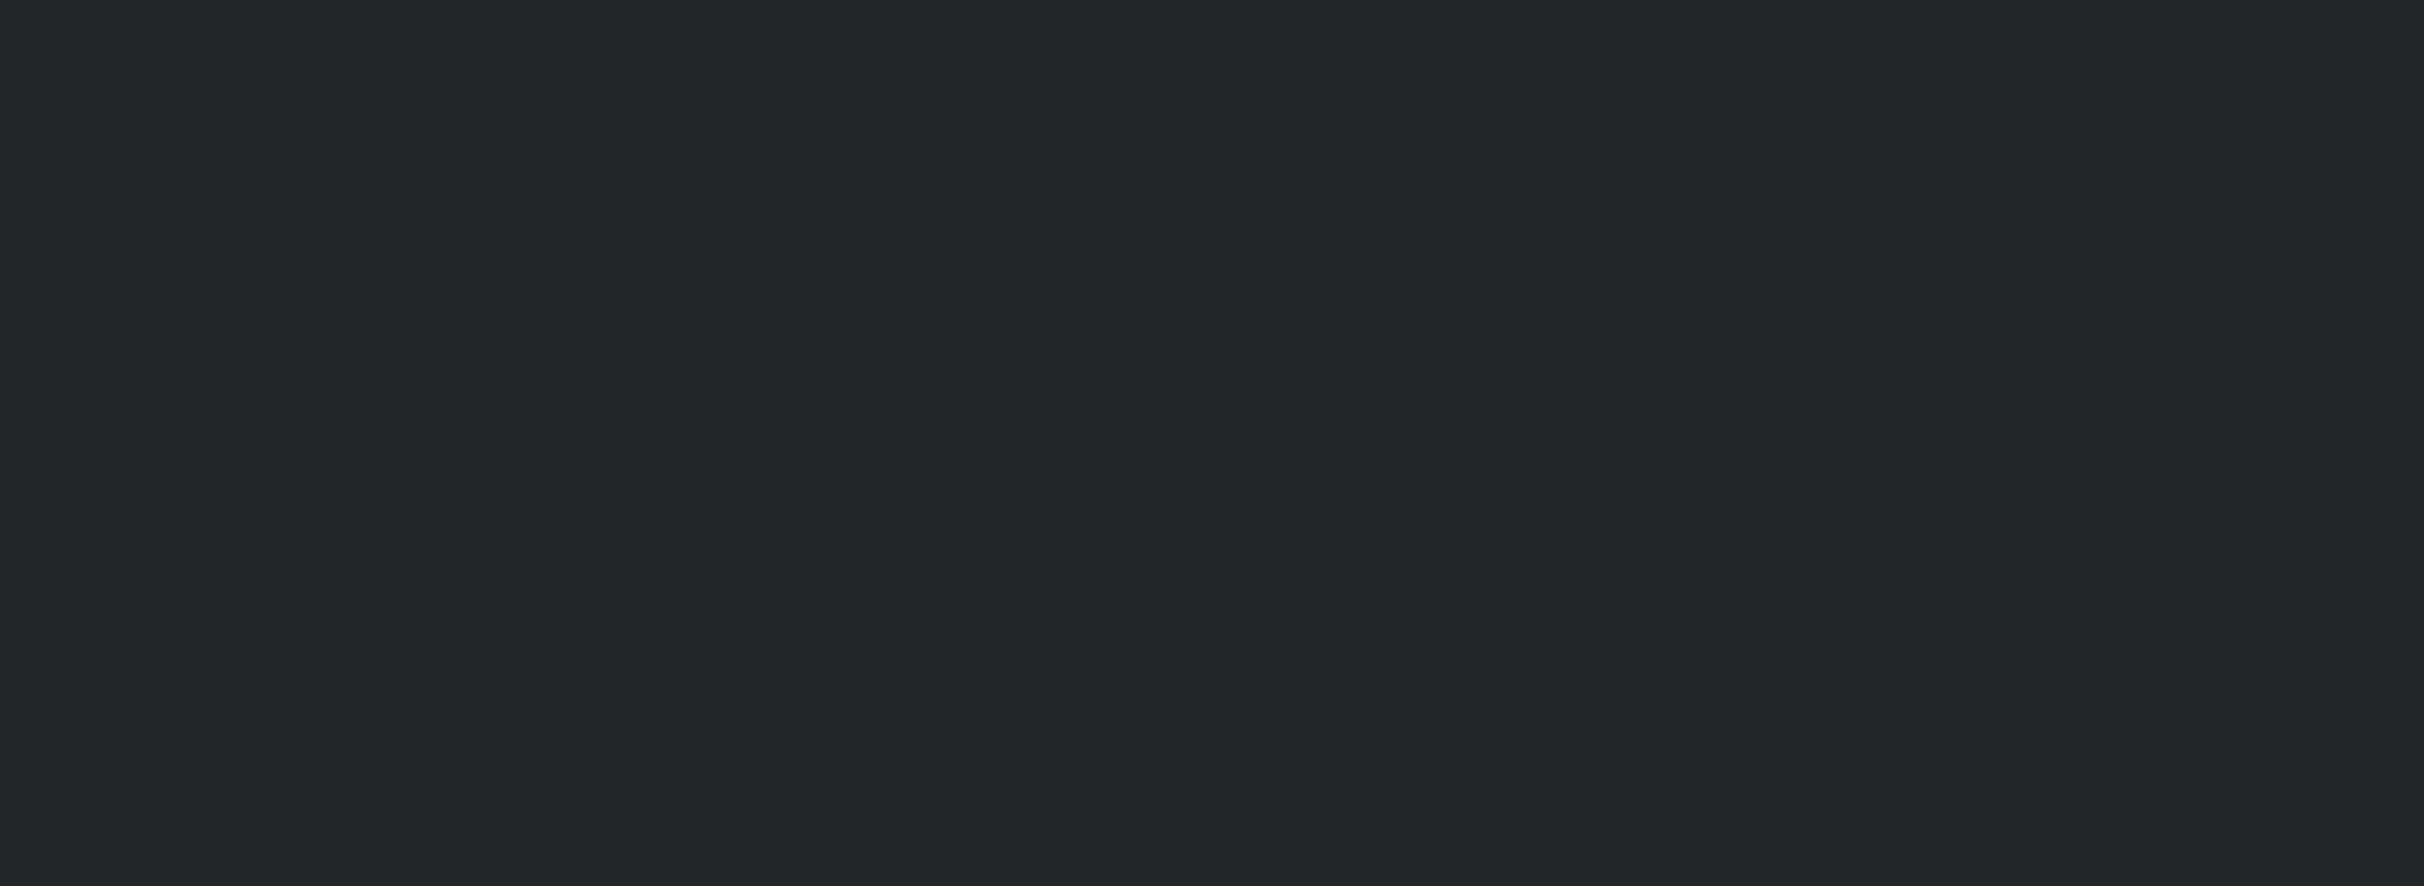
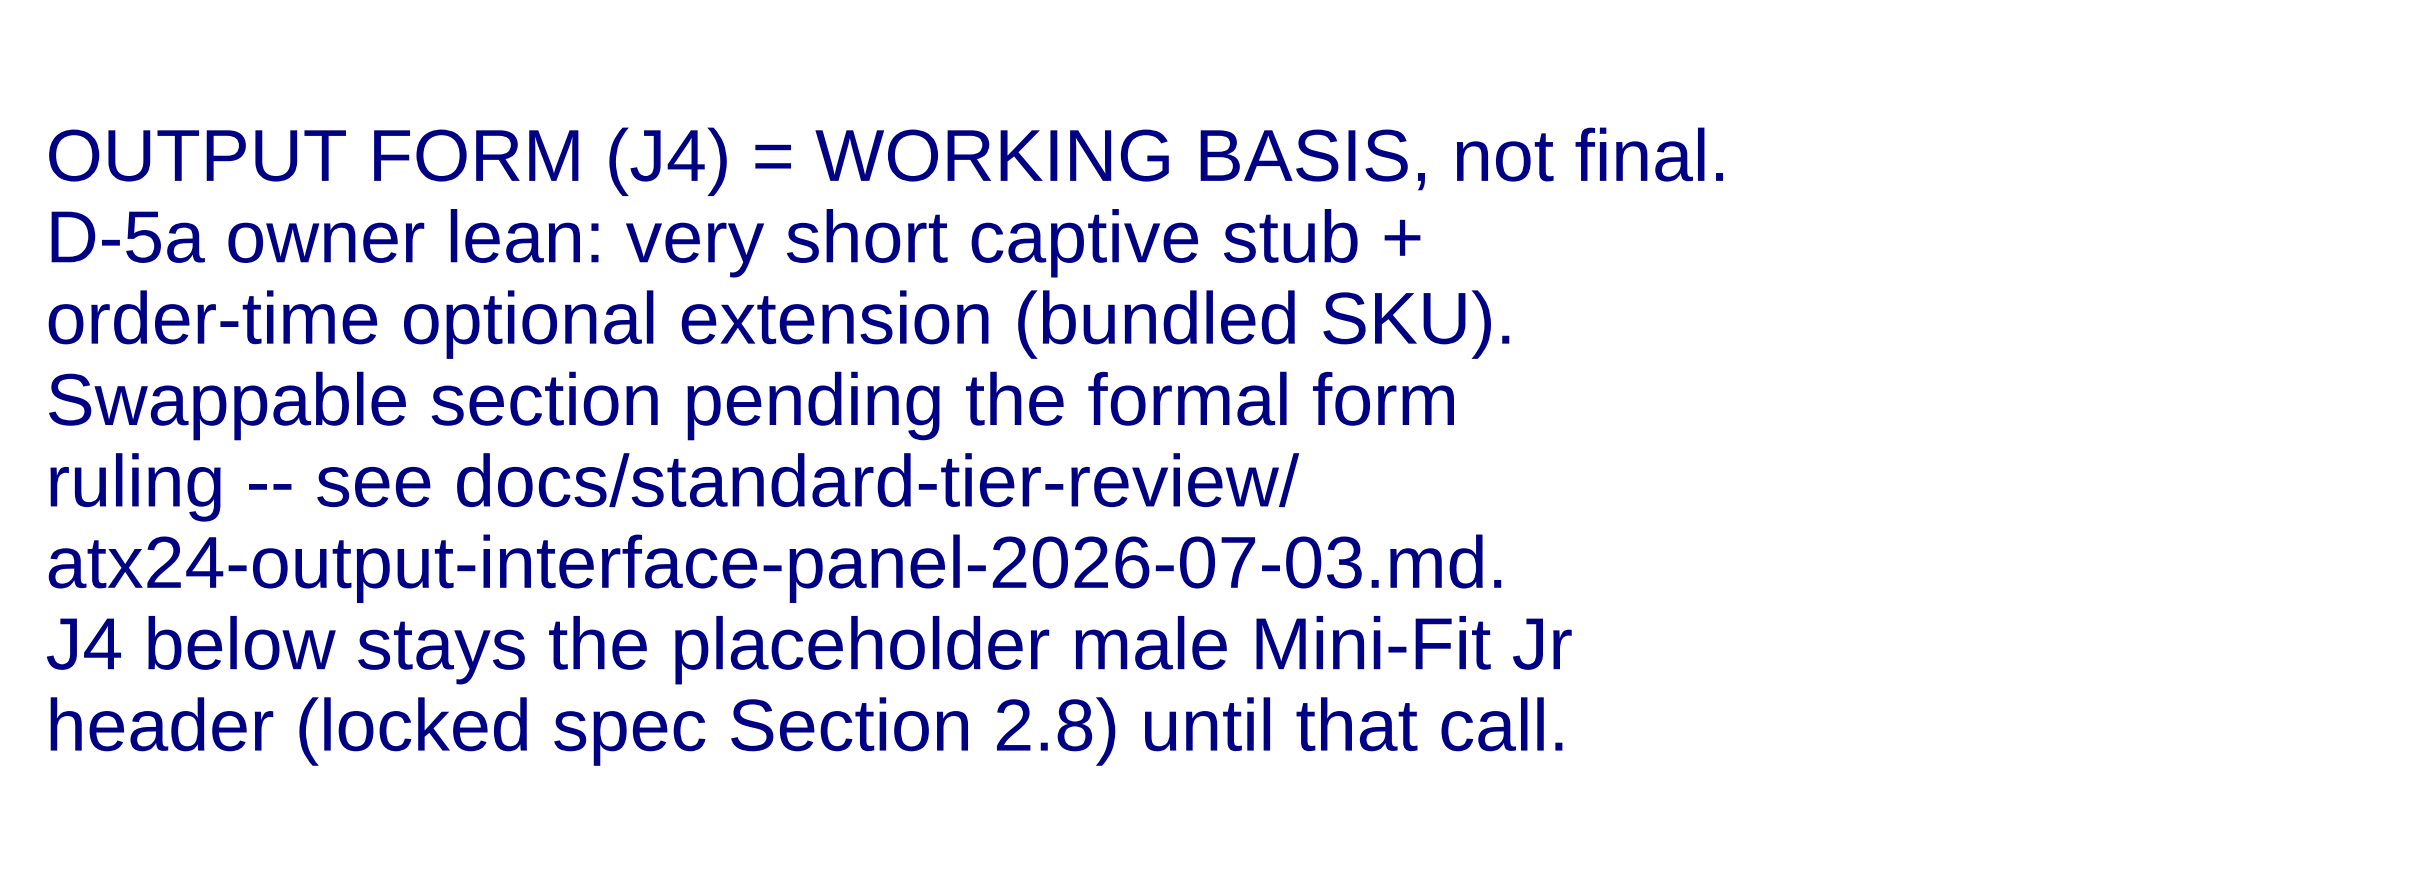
text: none -> OUTPUT FORM (J4) = WORKING BASIS, not final. (886, 161)
text: none -> D-5a owner lean: very short captive stub + (736, 243)
text: none -> order-time optional extension (bundled SKU). (778, 324)
text: none -> Swappable section pending the formal form (751, 406)
text: none -> ruling -- see docs/standard-tier-review/ (674, 487)
text: none -> atx24-output-interface-panel-2026-07-03.md. (774, 568)
text: none -> J4 below stays the placeholder male Mini-Fit Jr (809, 650)
text: none -> header (locked spec Section 2.8) until that call. (806, 731)

